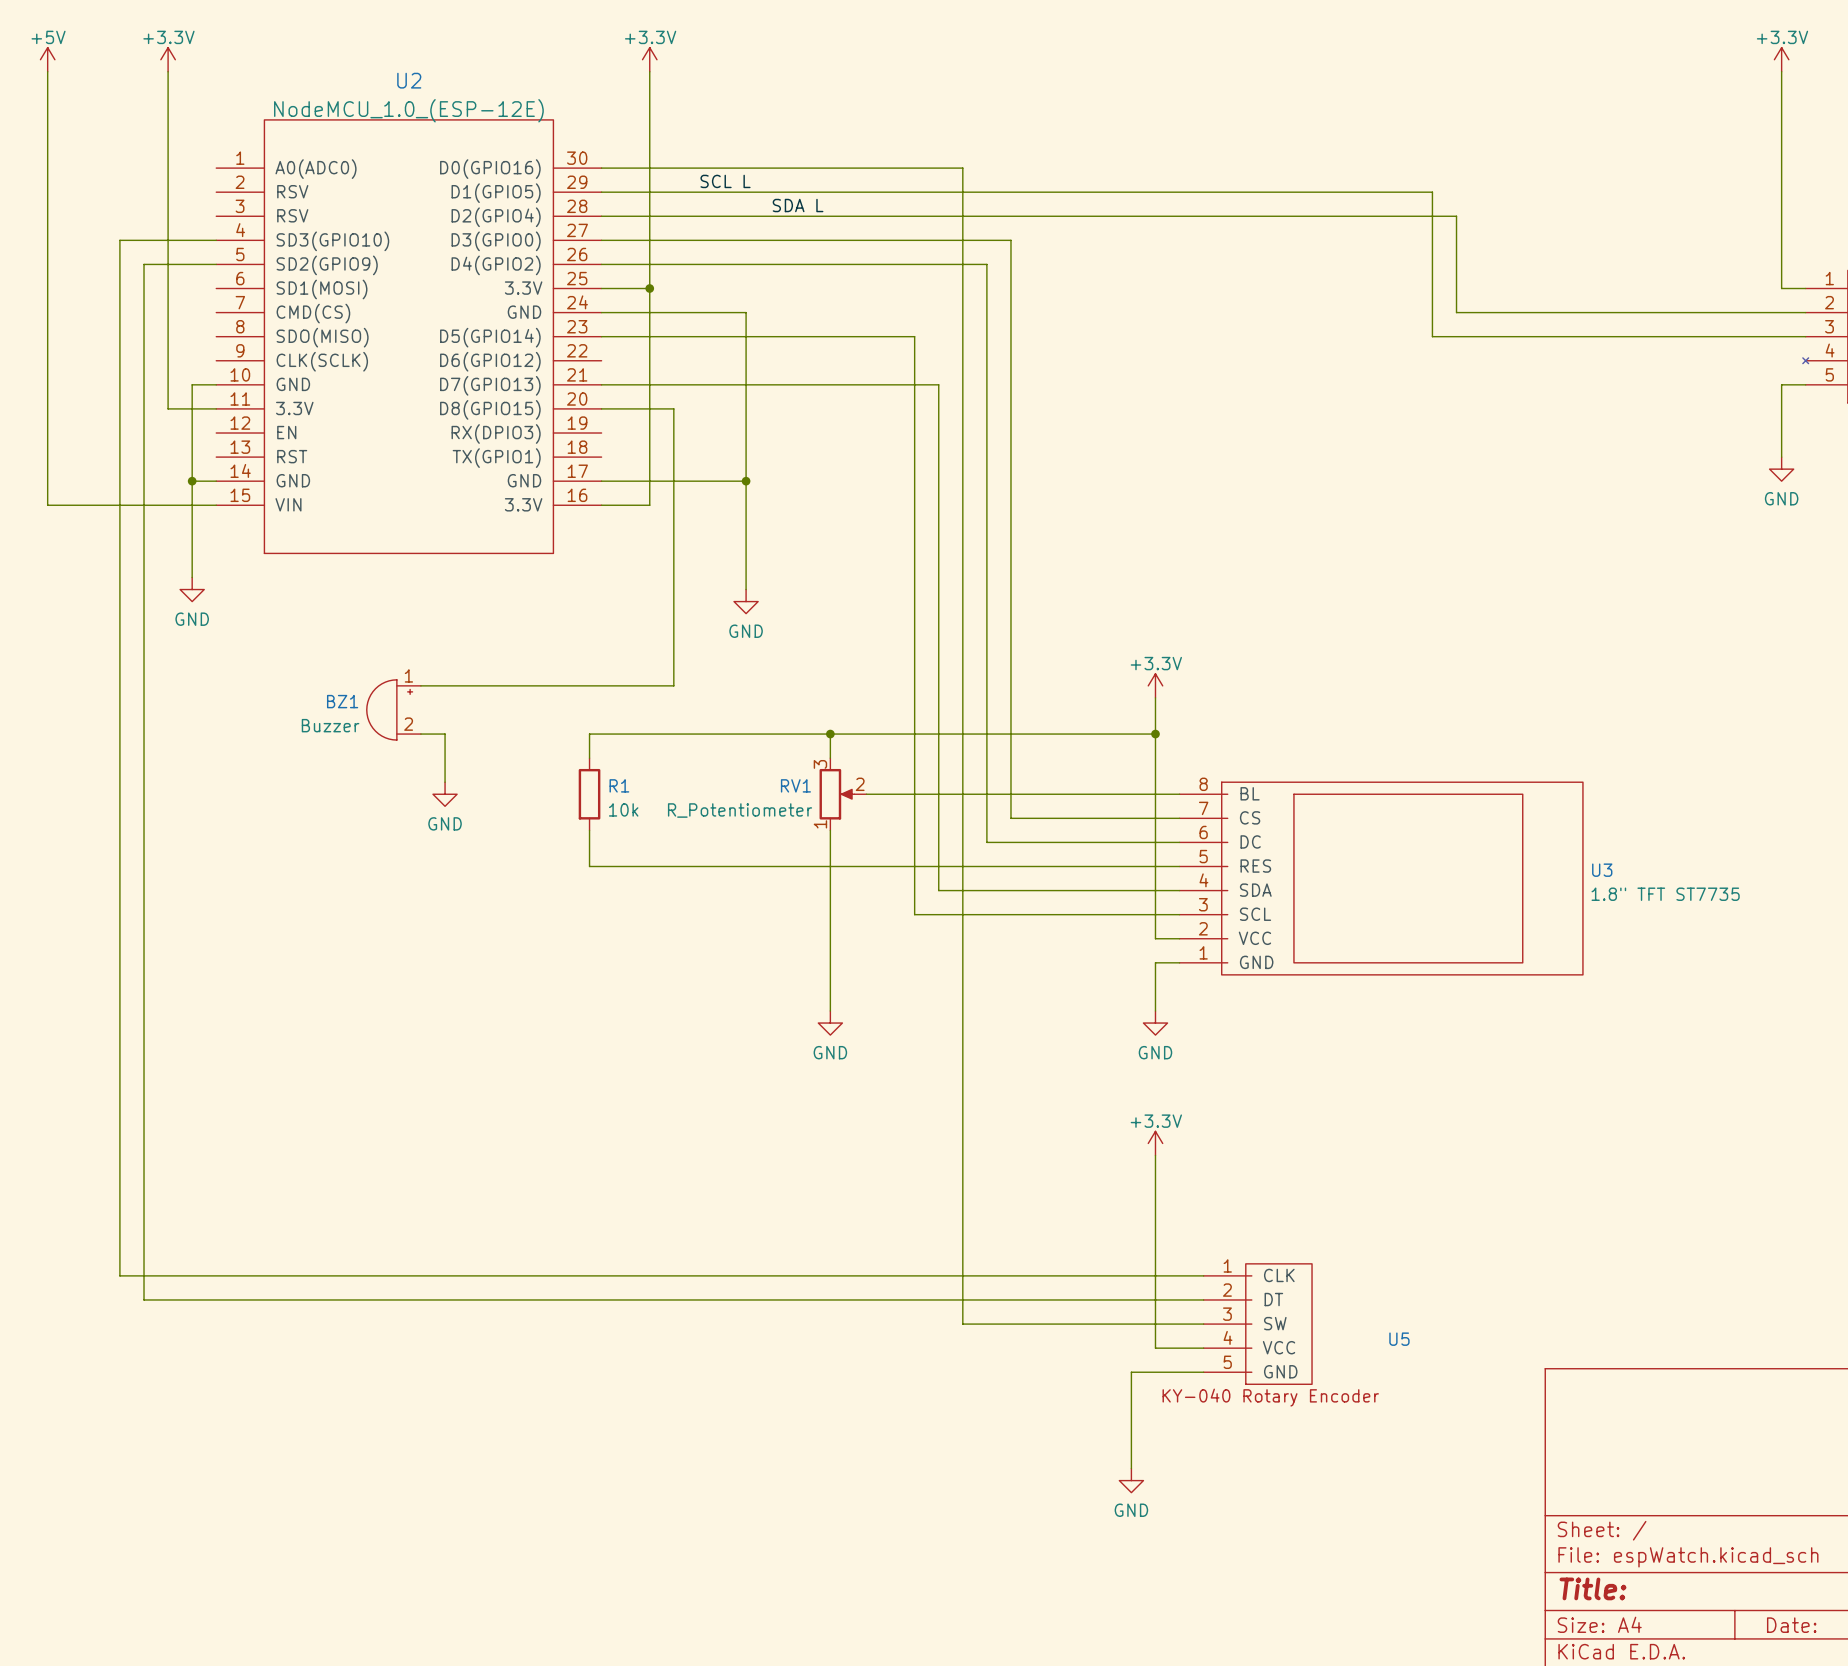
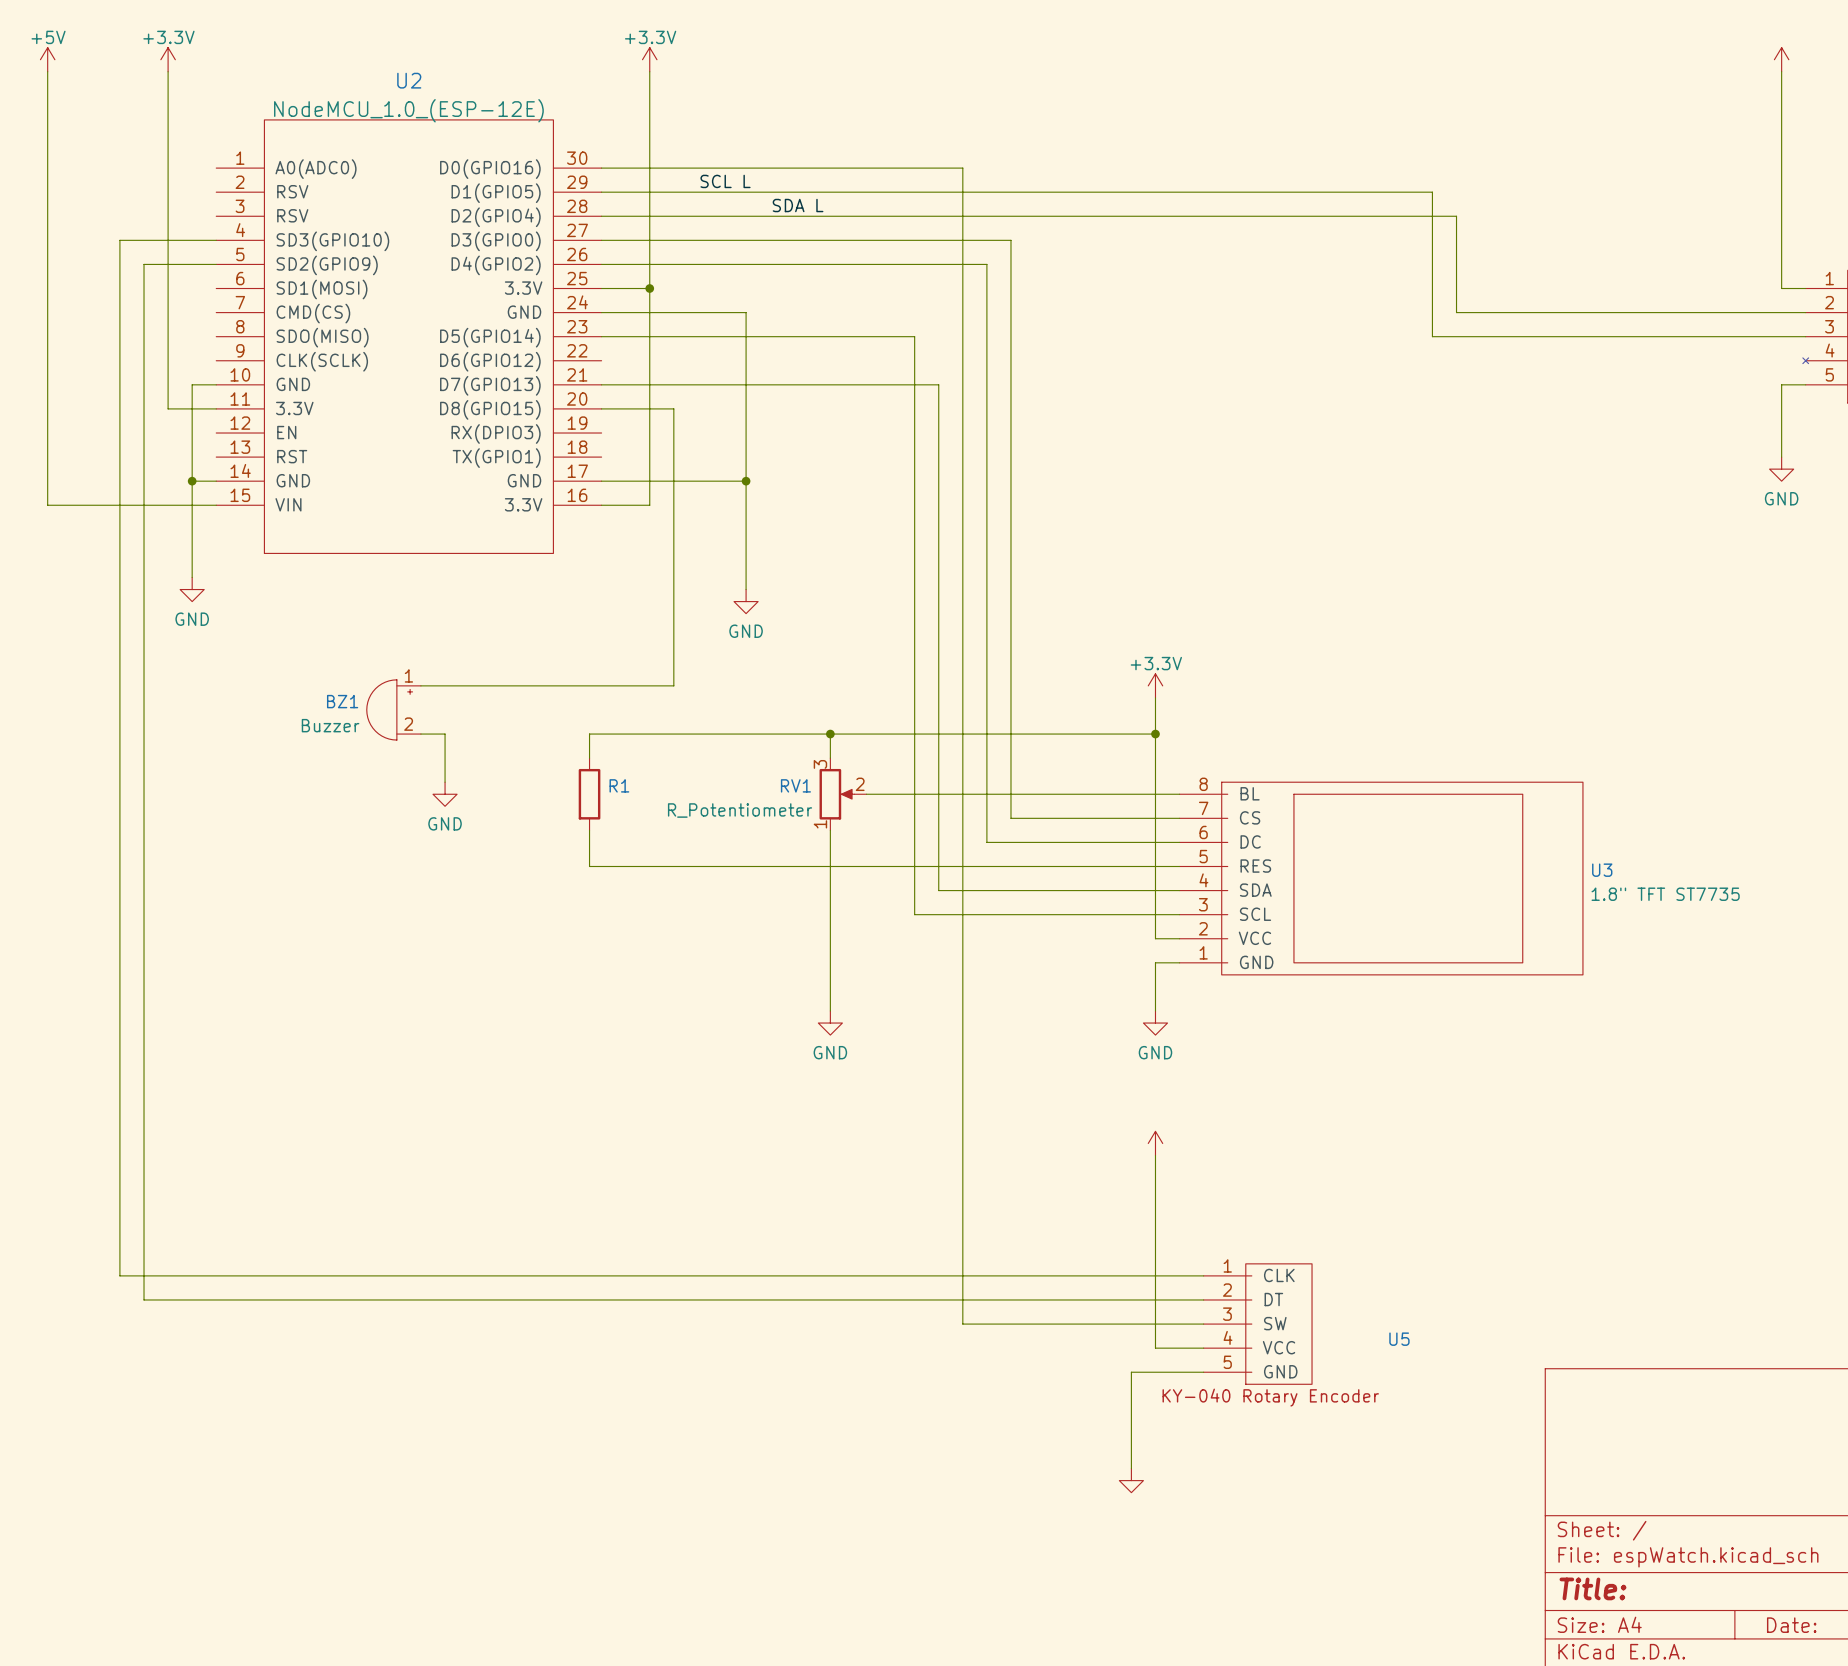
power symbol text: +3.3V (1782, 37) -> none
R1 value: 10k (623, 809) -> none
power symbol text: +3.3V (1156, 1121) -> none
power symbol text: GND (1131, 1510) -> none

